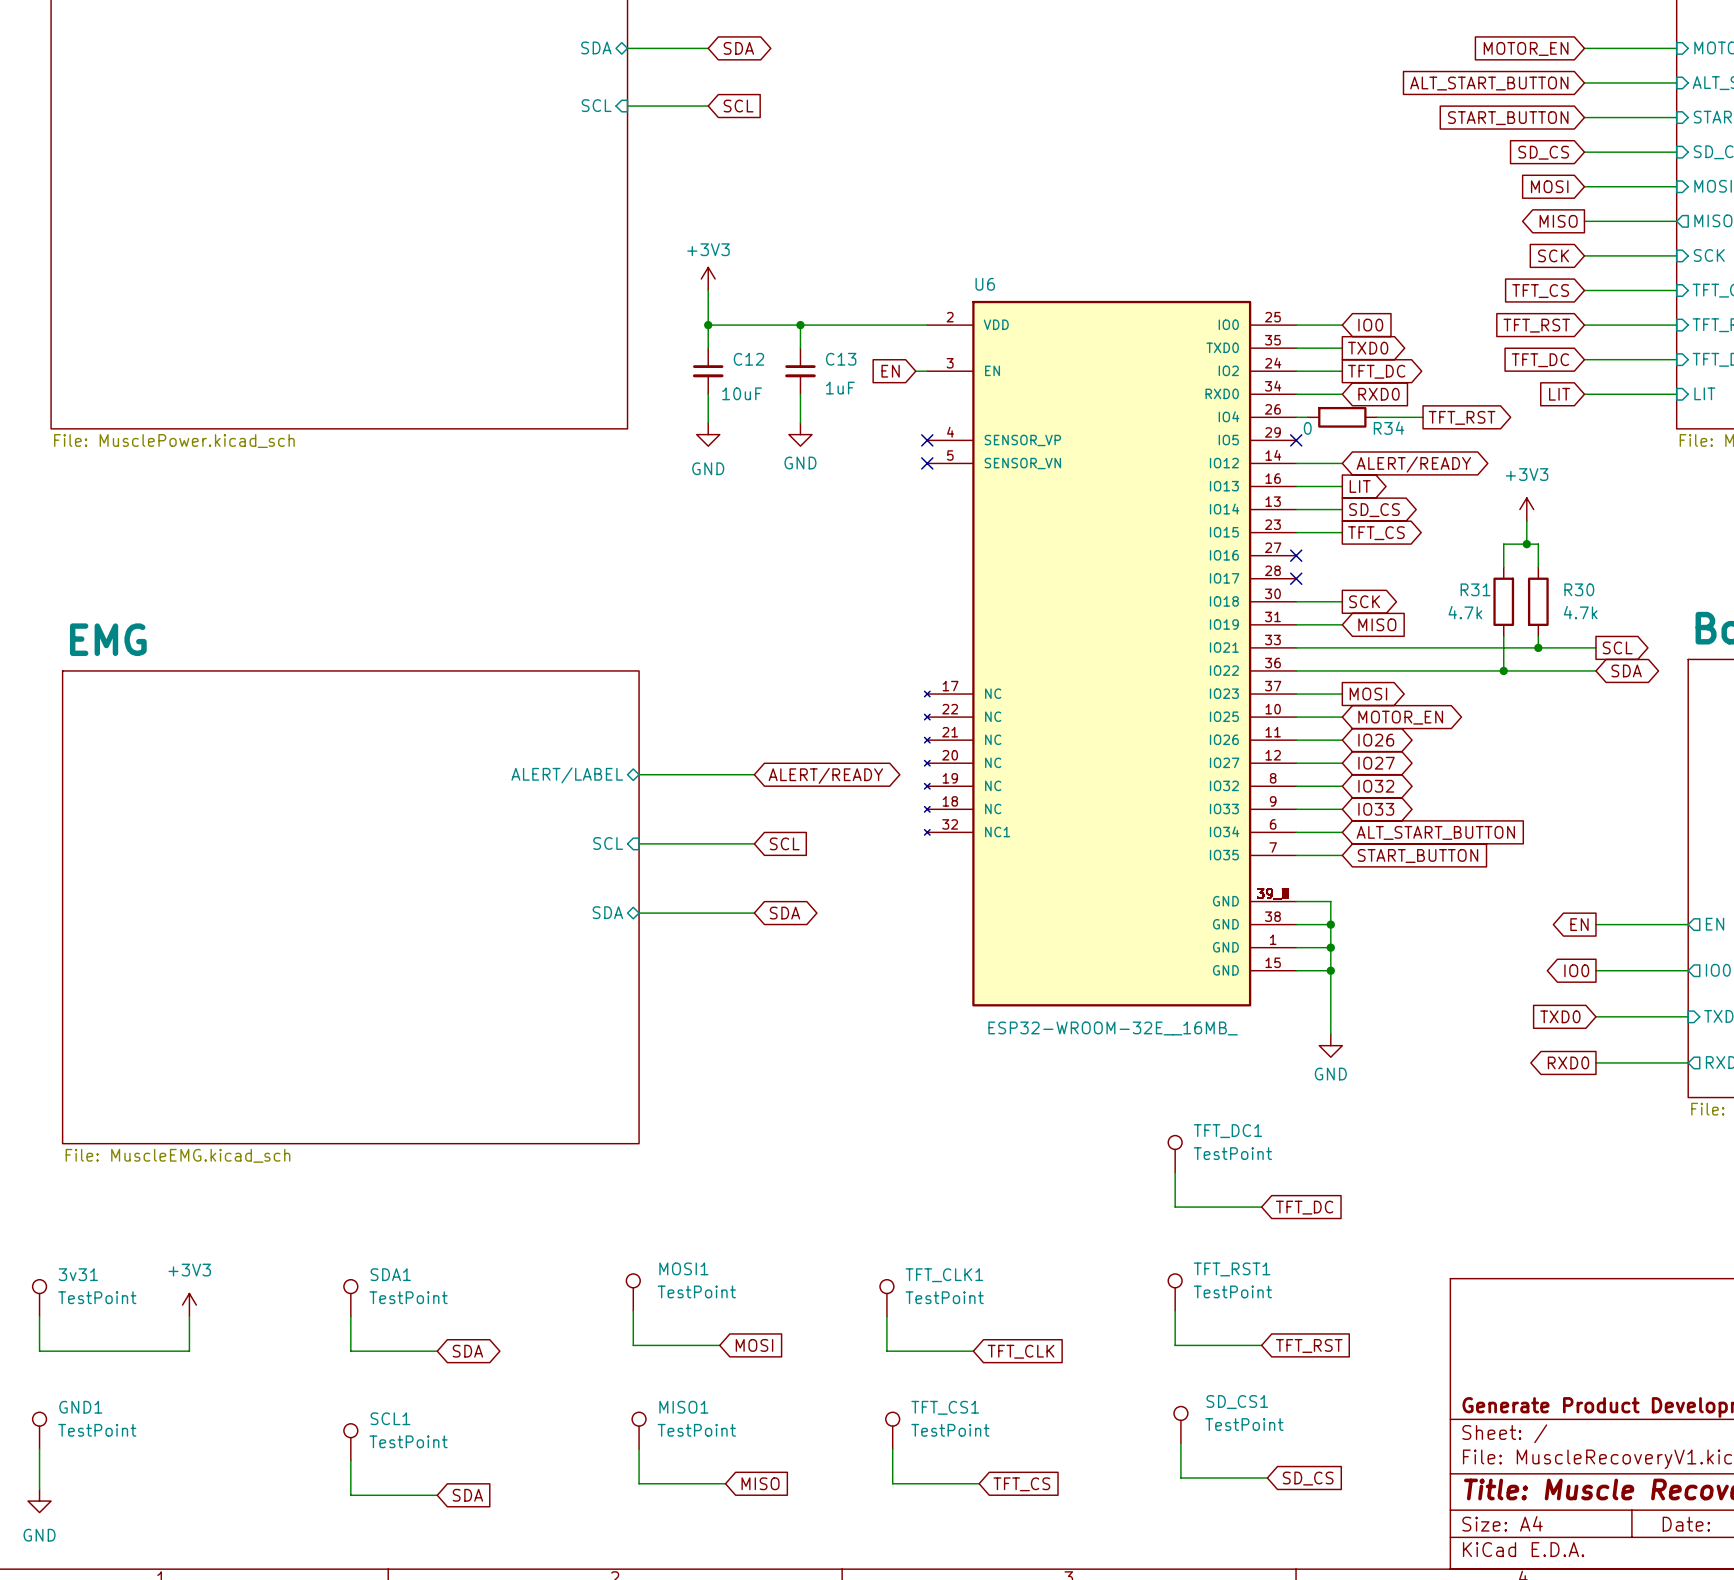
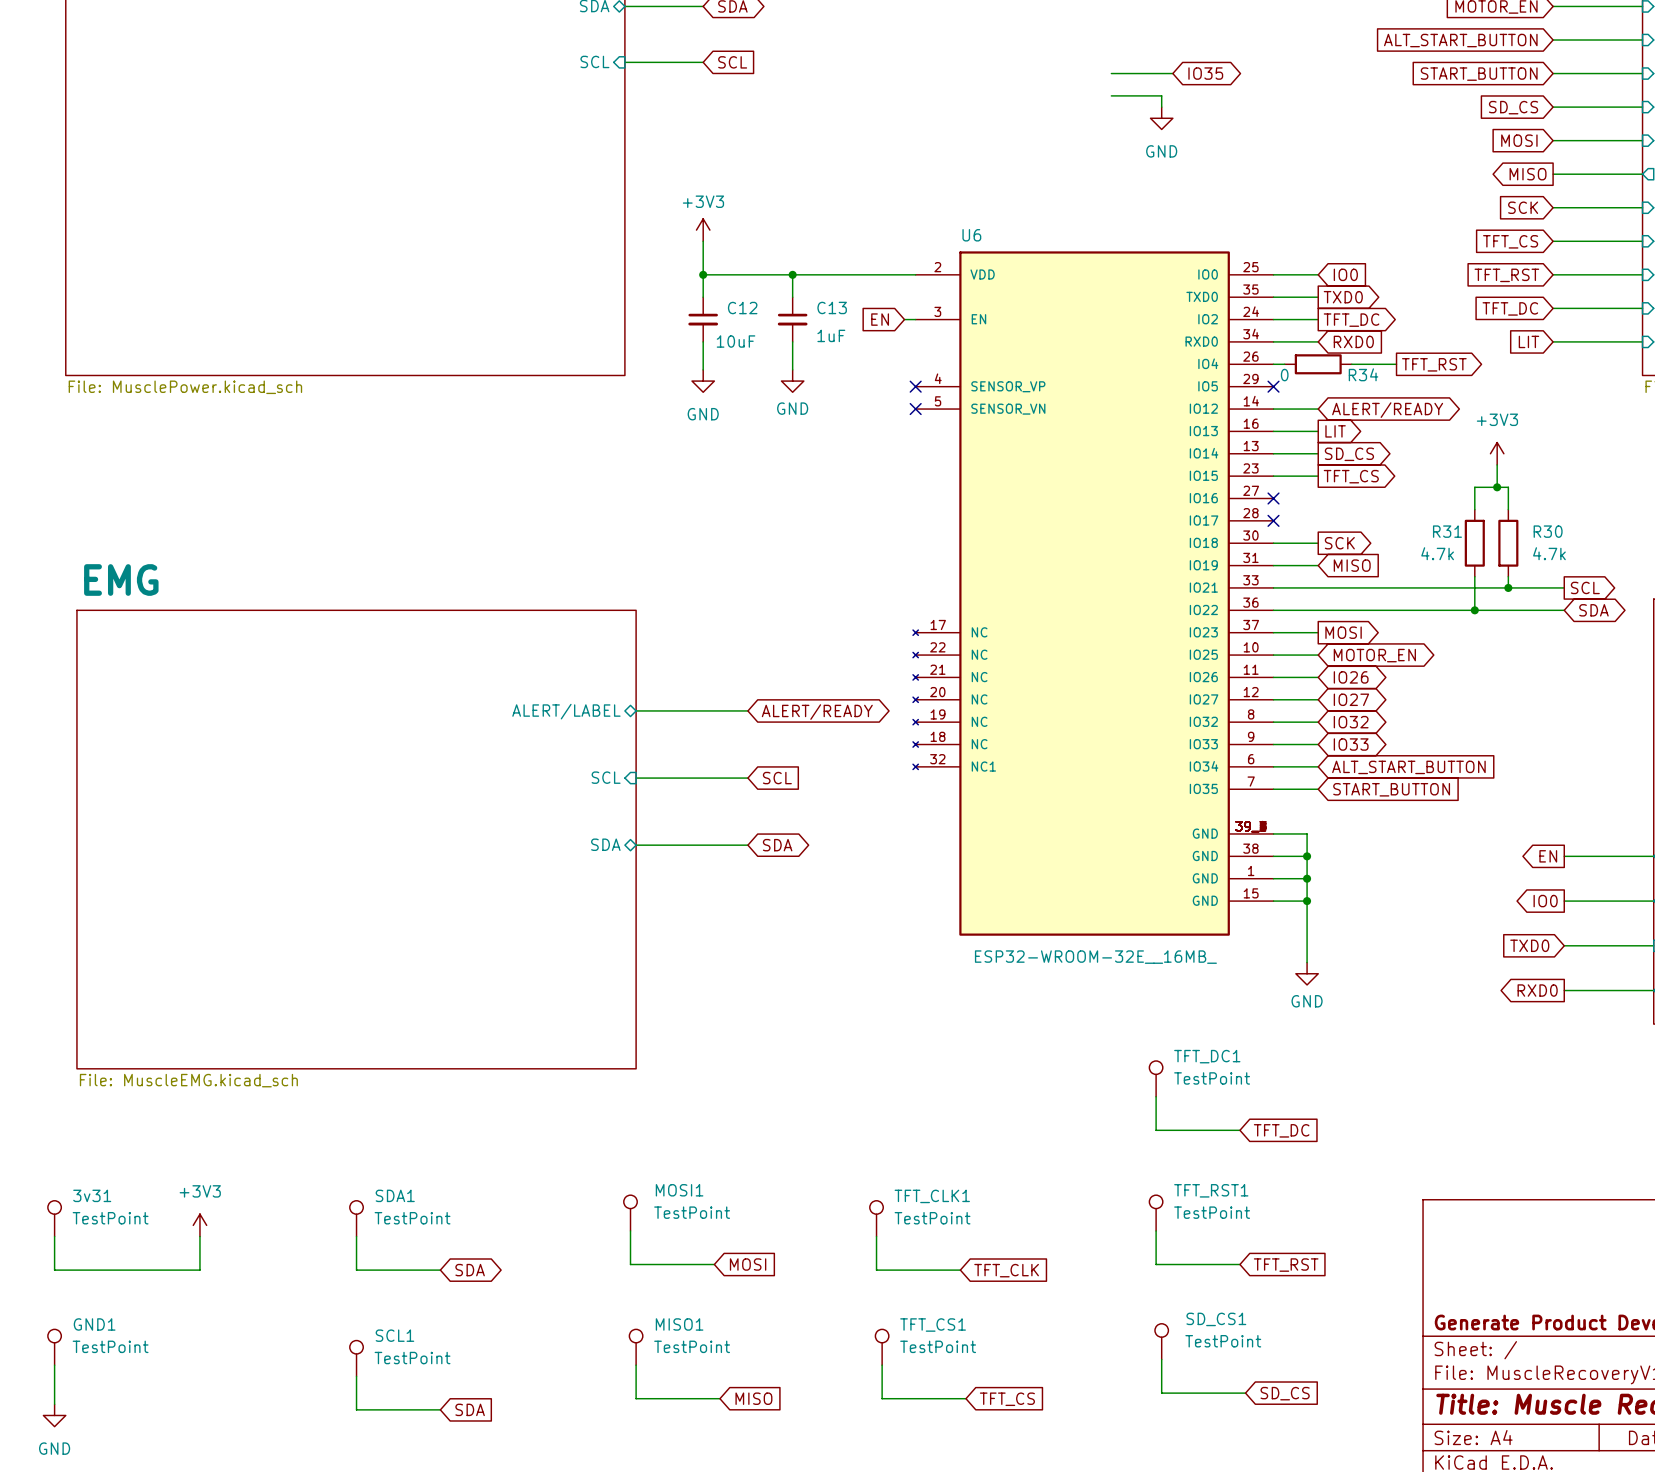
wire: none -> (1111, 73) (1172, 73)
global label: none -> IO35 (1205, 73)
wire: none -> (1111, 95) (1161, 95) (1161, 107)
power symbol: none -> GND (1161, 118)

